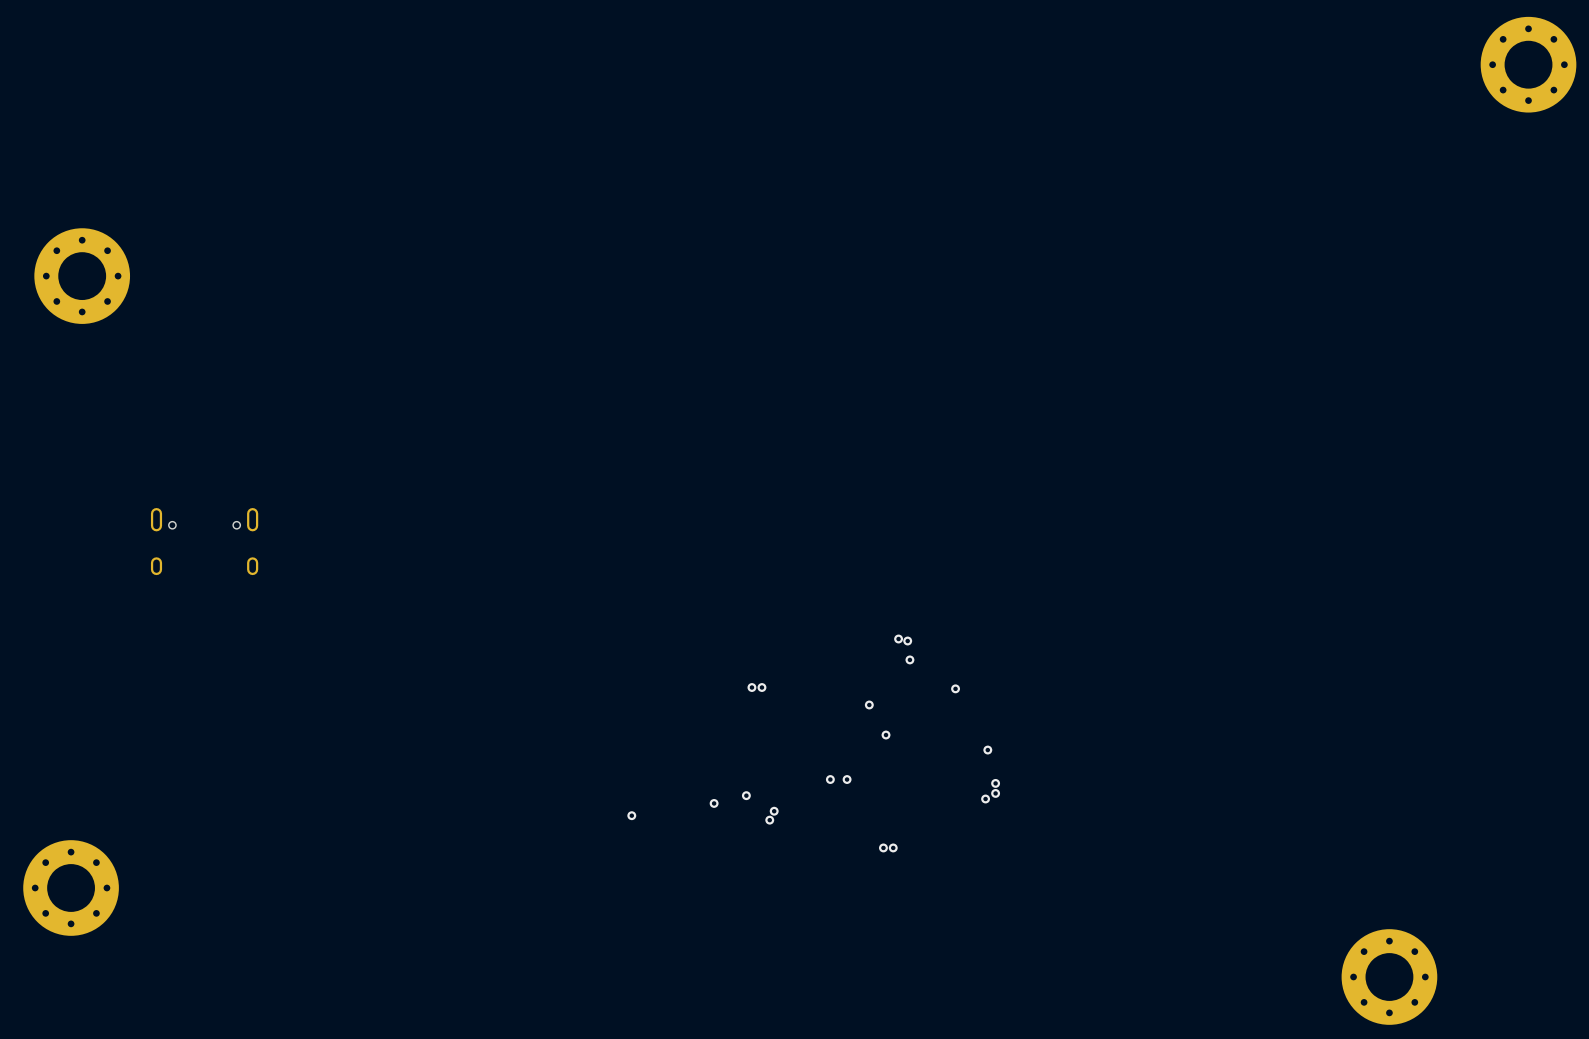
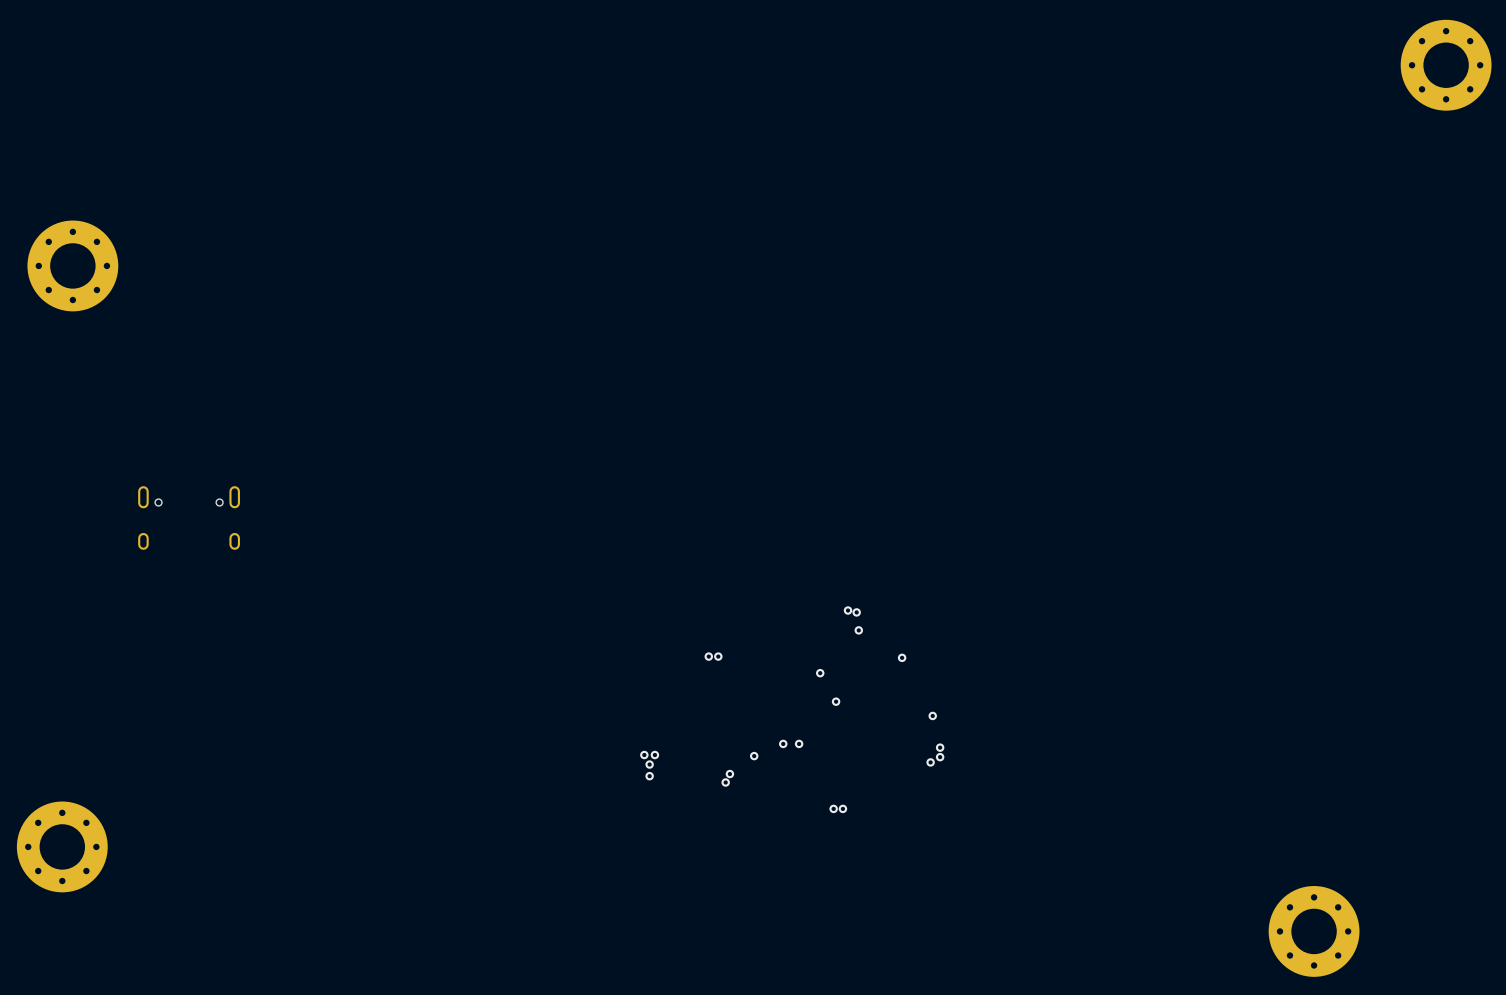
via: none -> (644, 755)
via: none -> (654, 755)
via: none -> (754, 756)
via: (746, 795) -> none
via: none -> (649, 764)
via: (714, 803) -> none
via: none -> (649, 776)
via: (631, 815) -> none

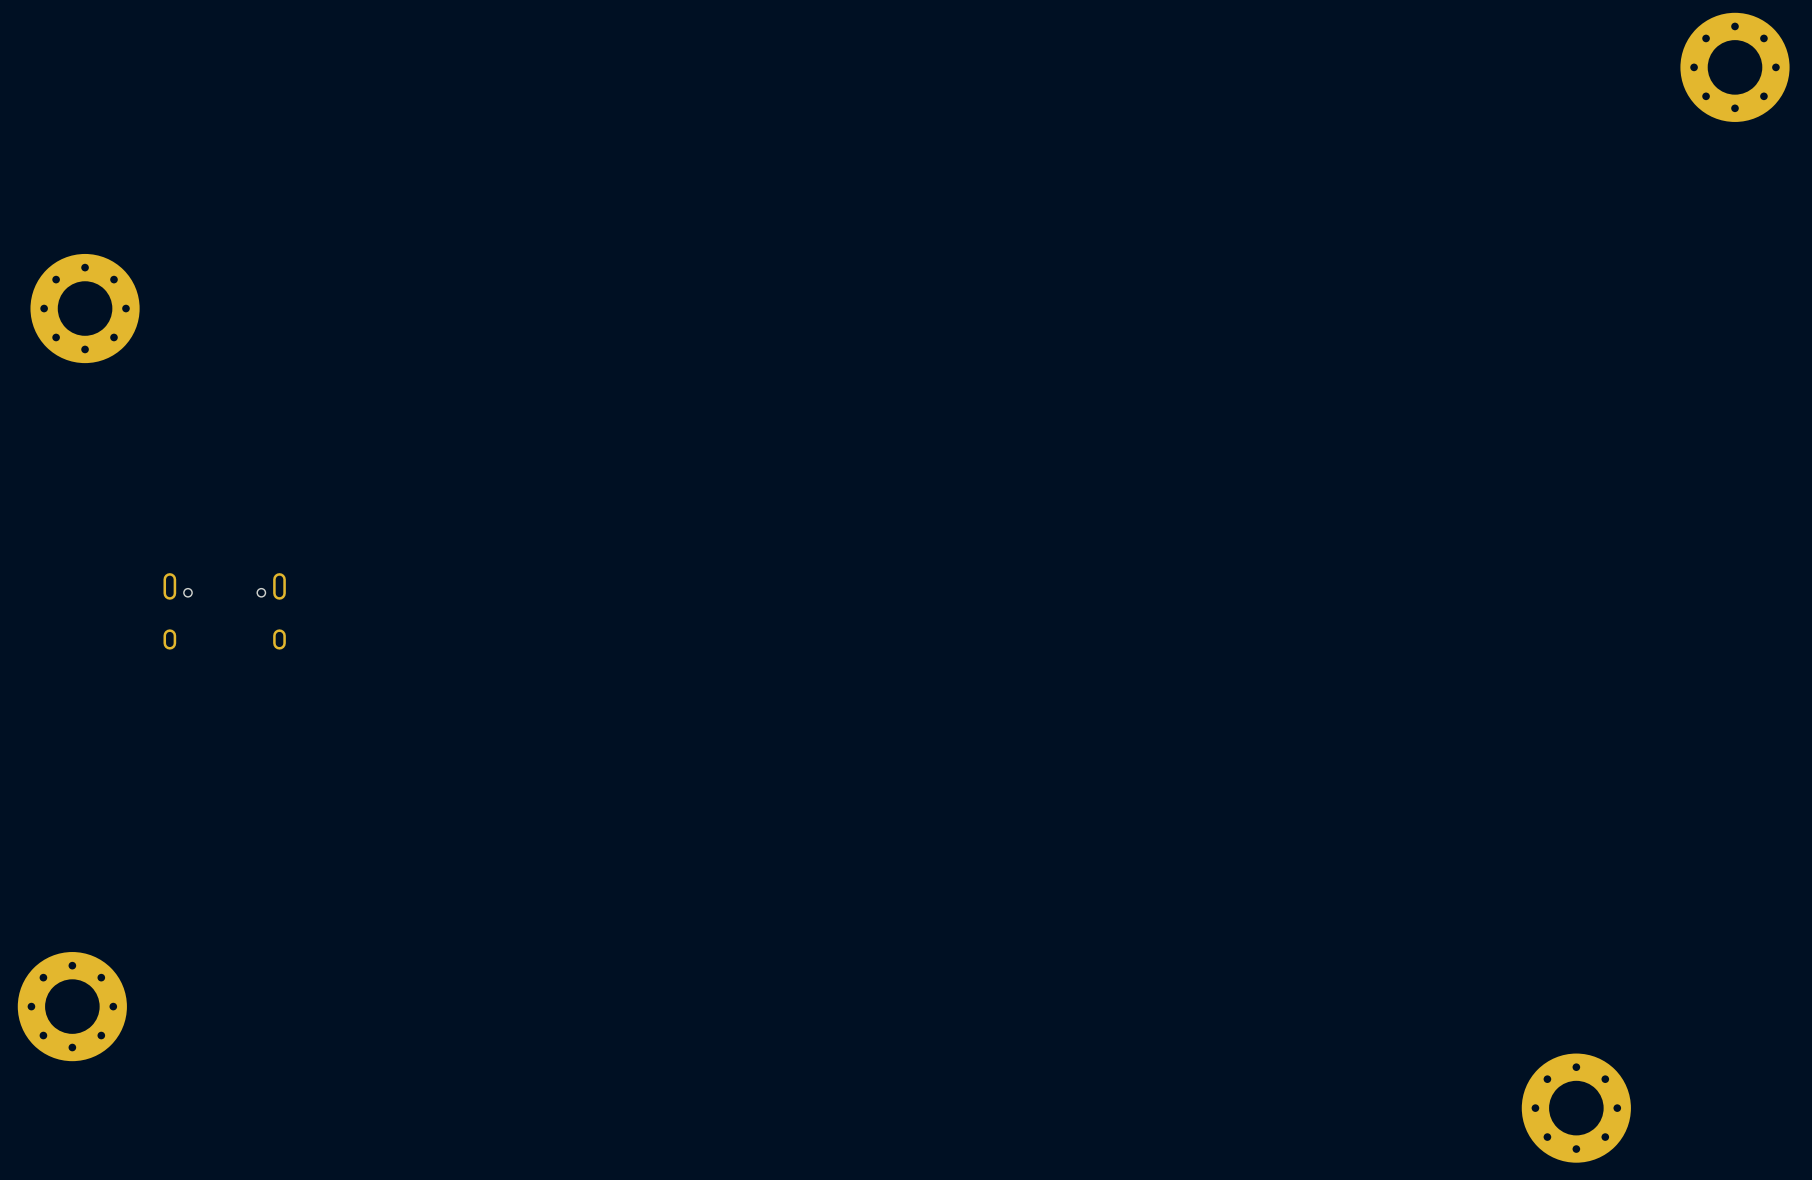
via: (848, 610) -> none
via: (856, 612) -> none
via: (858, 630) -> none
via: (708, 656) -> none
via: (718, 656) -> none
via: (902, 657) -> none
via: (820, 673) -> none
via: (836, 701) -> none
via: (932, 715) -> none
via: (783, 743) -> none
via: (799, 743) -> none
via: (940, 747) -> none
via: (644, 755) -> none
via: (654, 755) -> none
via: (754, 756) -> none
via: (940, 757) -> none
via: (930, 762) -> none
via: (649, 764) -> none
via: (729, 774) -> none
via: (649, 776) -> none
via: (725, 782) -> none
via: (833, 808) -> none
via: (842, 808) -> none

